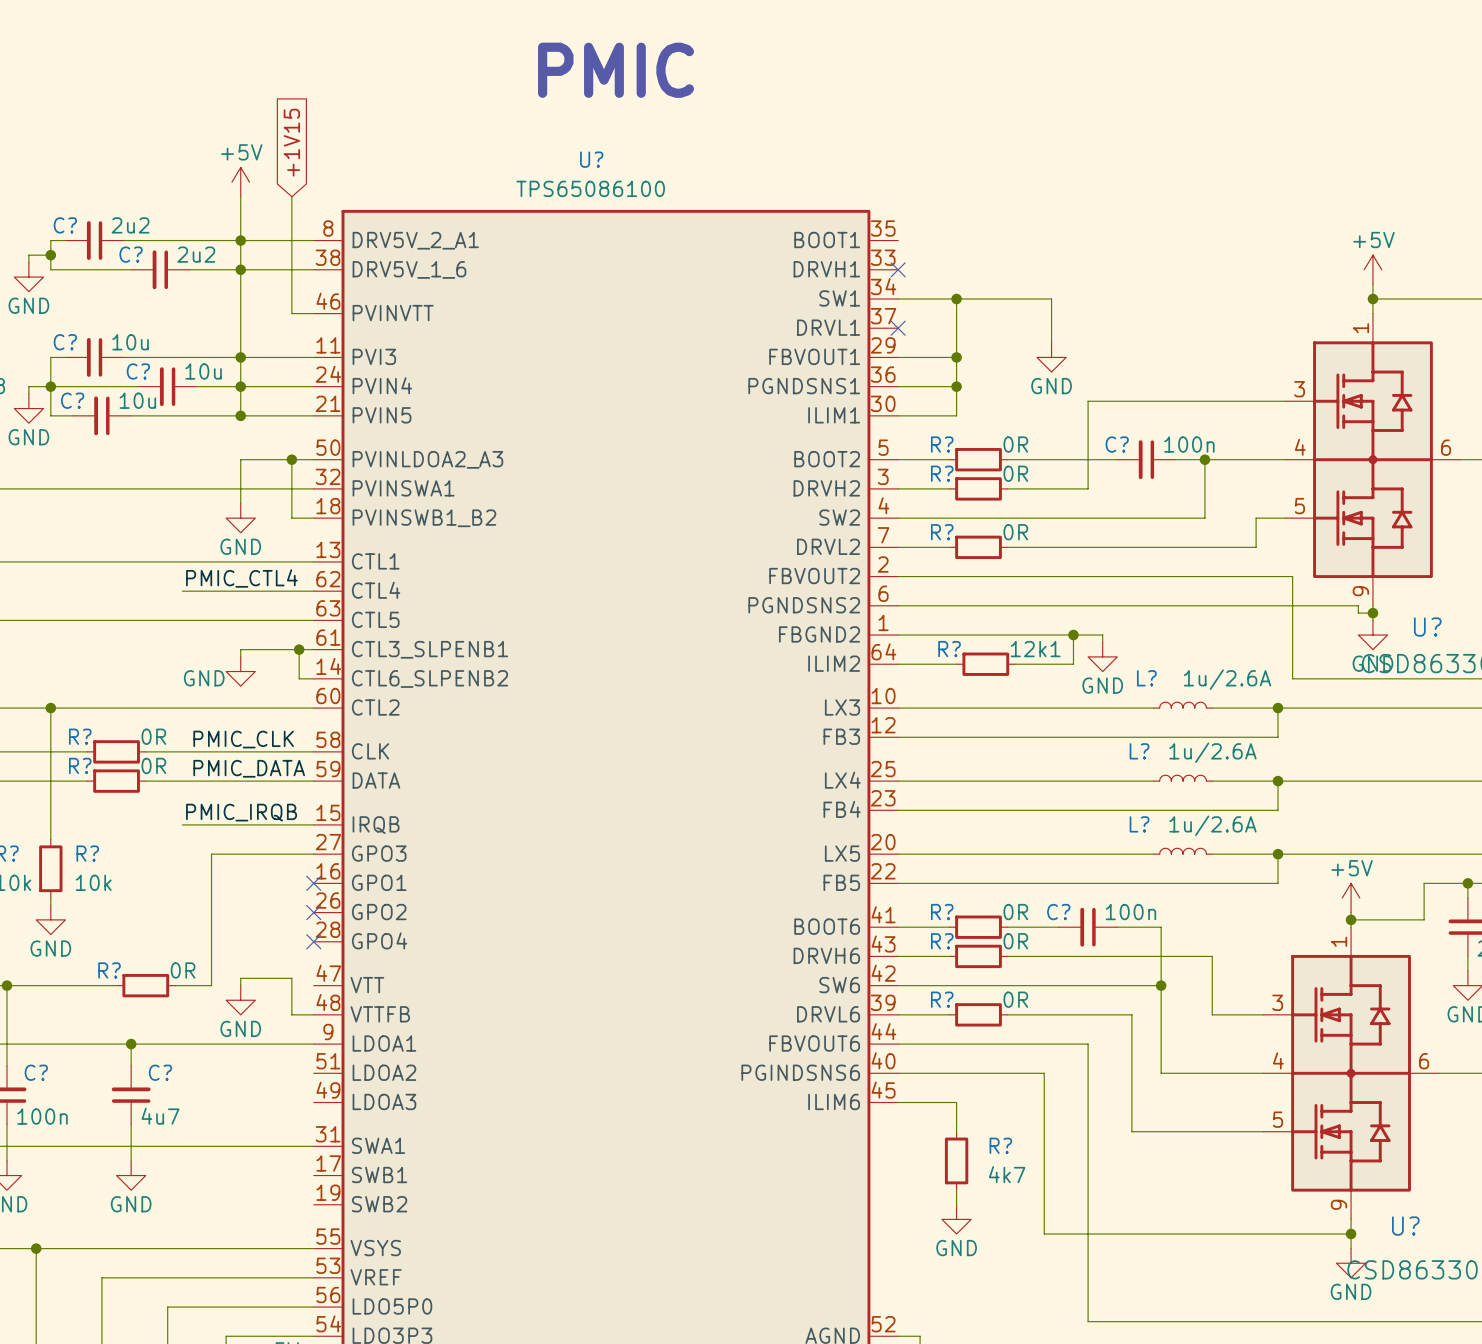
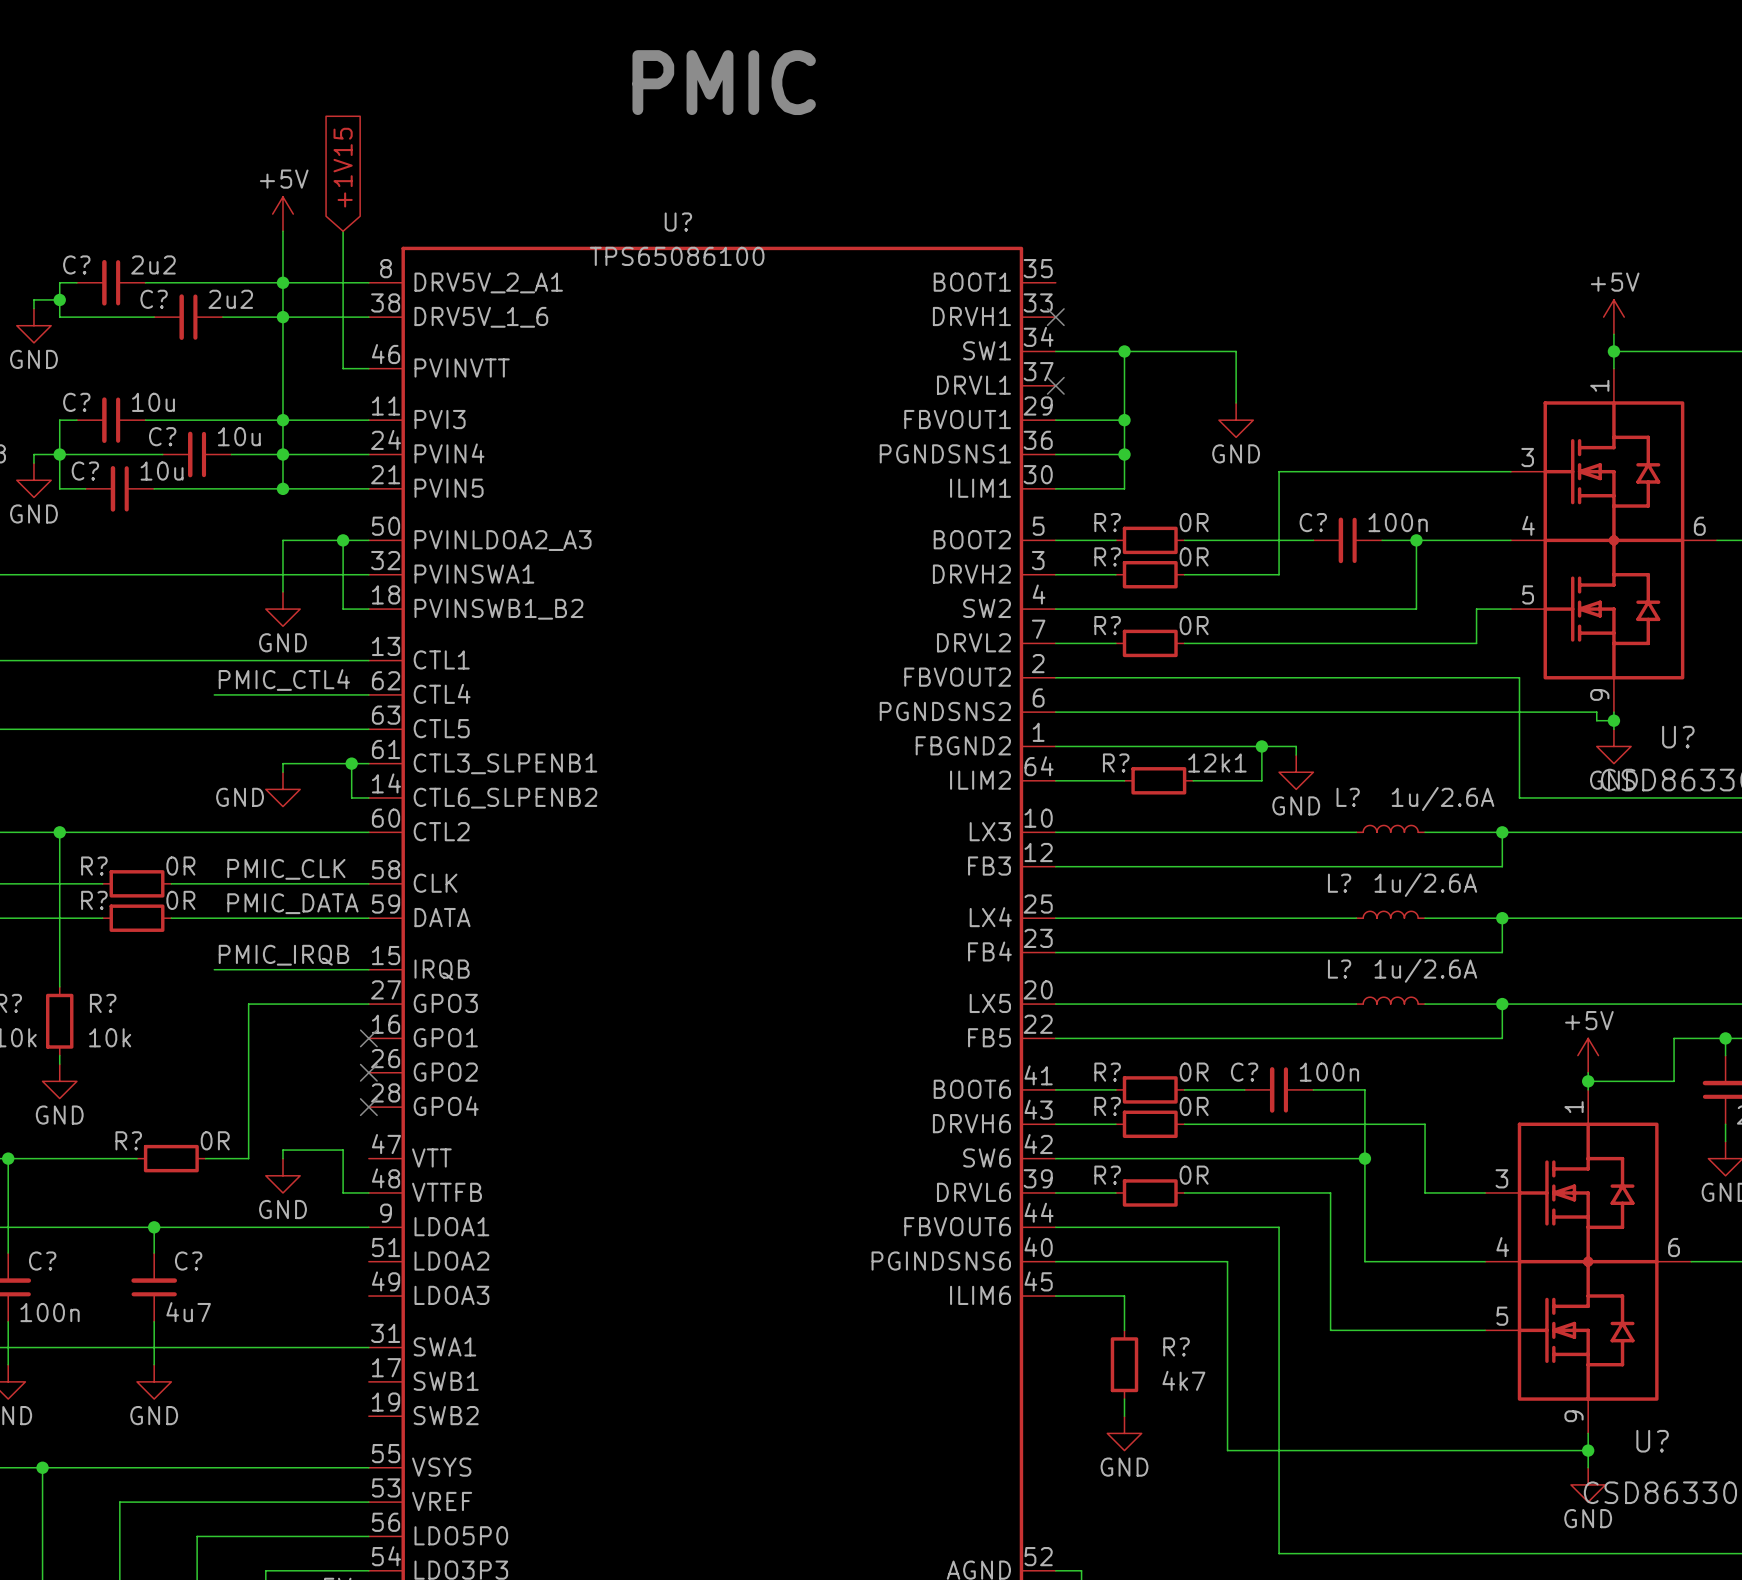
U? name position: U? (591, 159) -> U? (678, 222)
U? value position: TPS65086100 (590, 188) -> TPS65086100 (677, 256)

